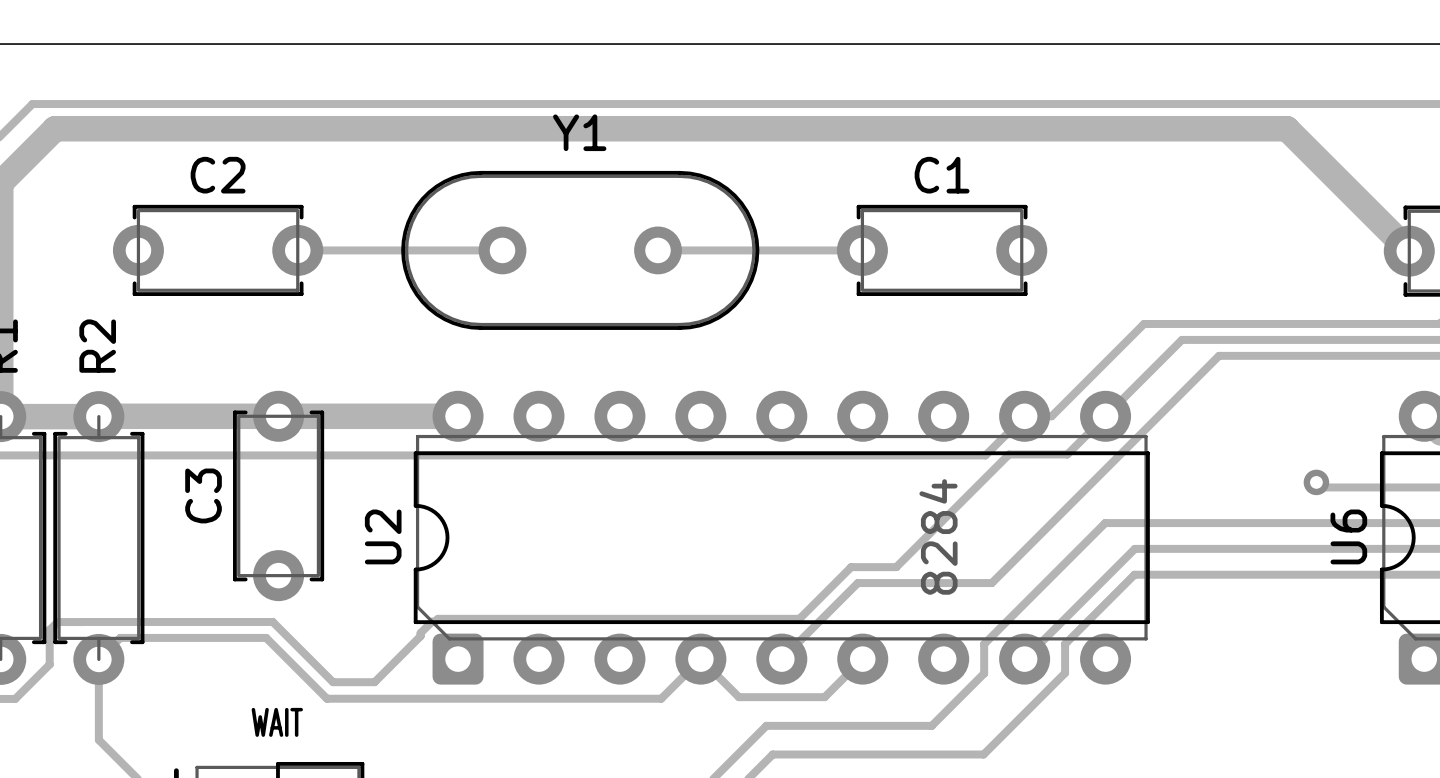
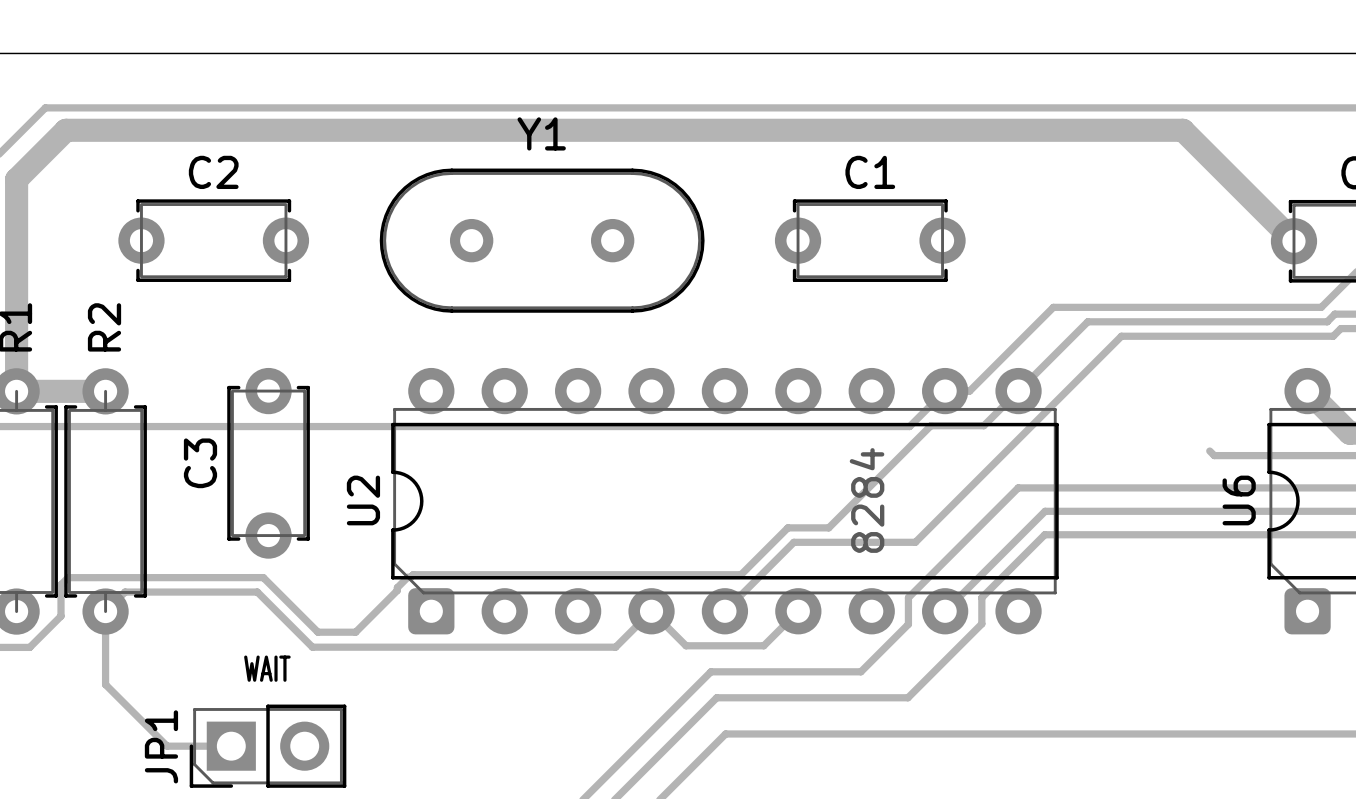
track: (297, 250) (502, 250) -> none
track: (658, 250) (862, 250) -> none
track: (98, 416) (458, 416) -> none
via: (1316, 482) -> none

